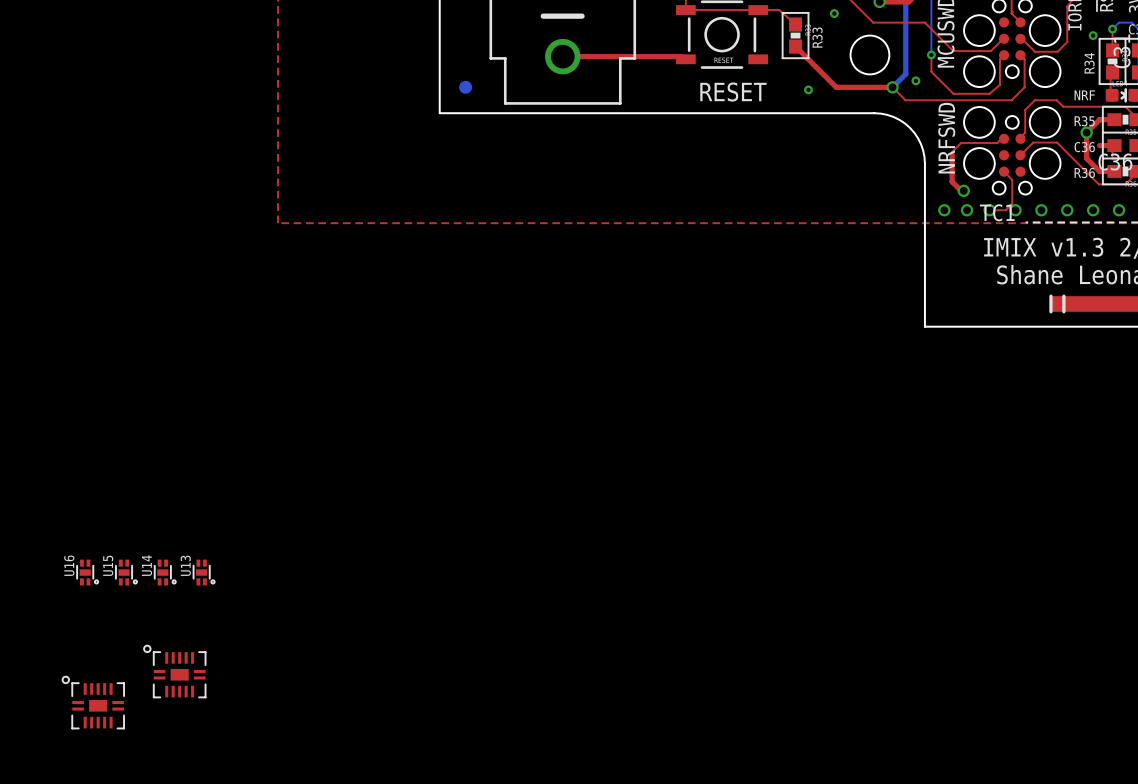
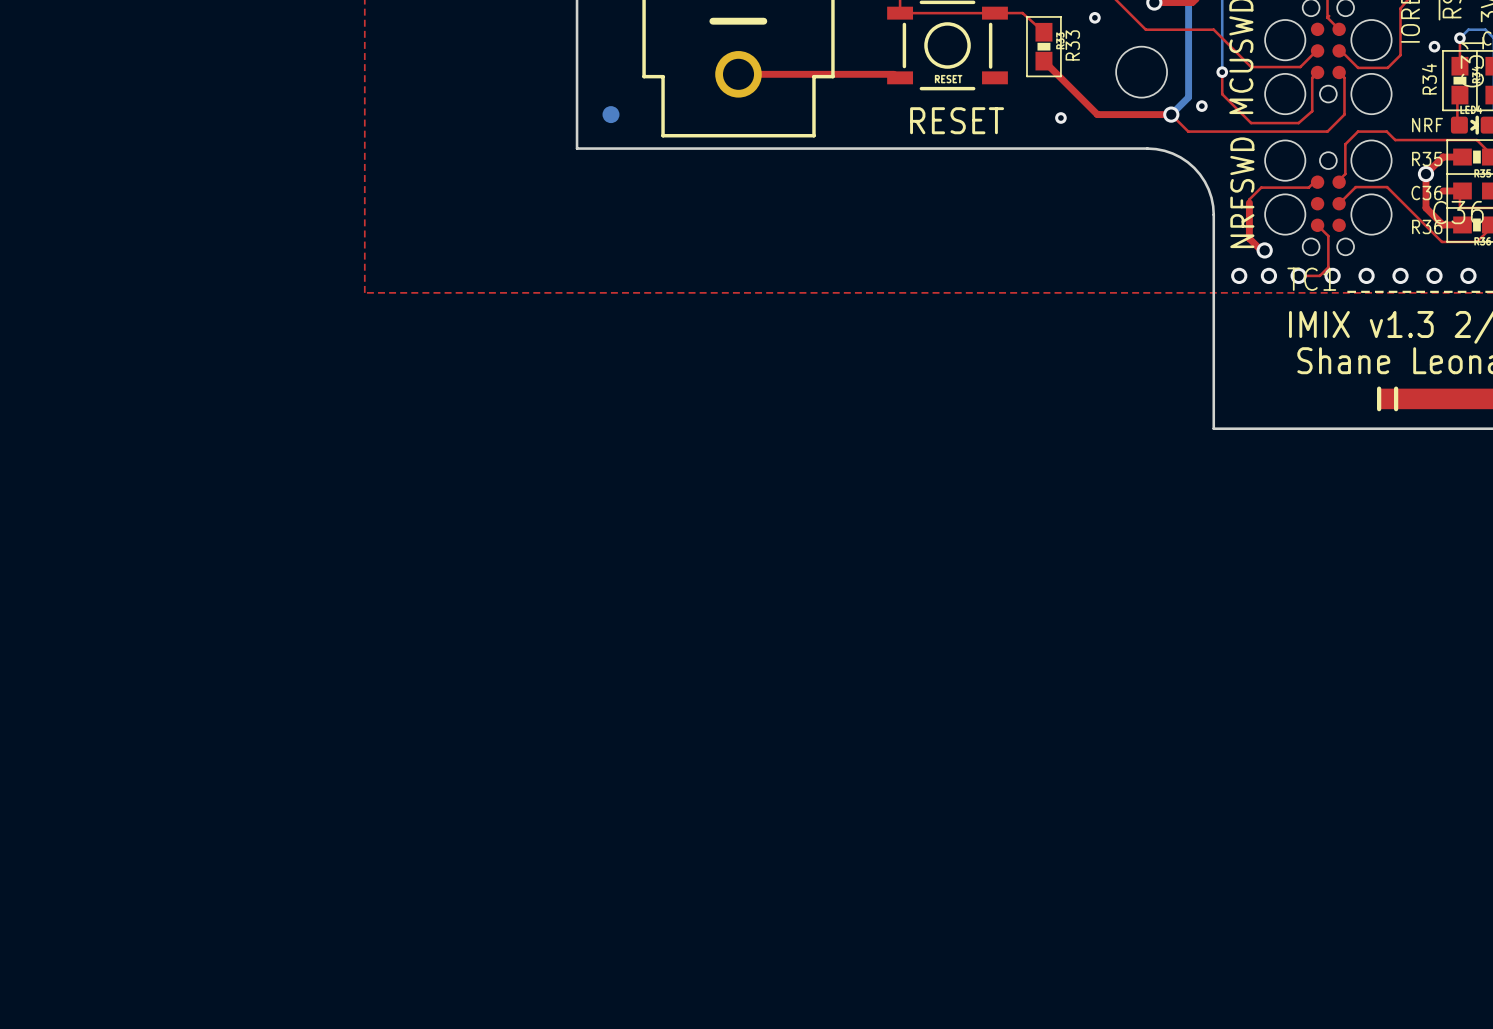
U16: (87, 572) -> none
U15: (126, 572) -> none
U14: (165, 572) -> none
U13: (204, 572) -> none
part: (174, 671) -> none
part: (93, 702) -> none

